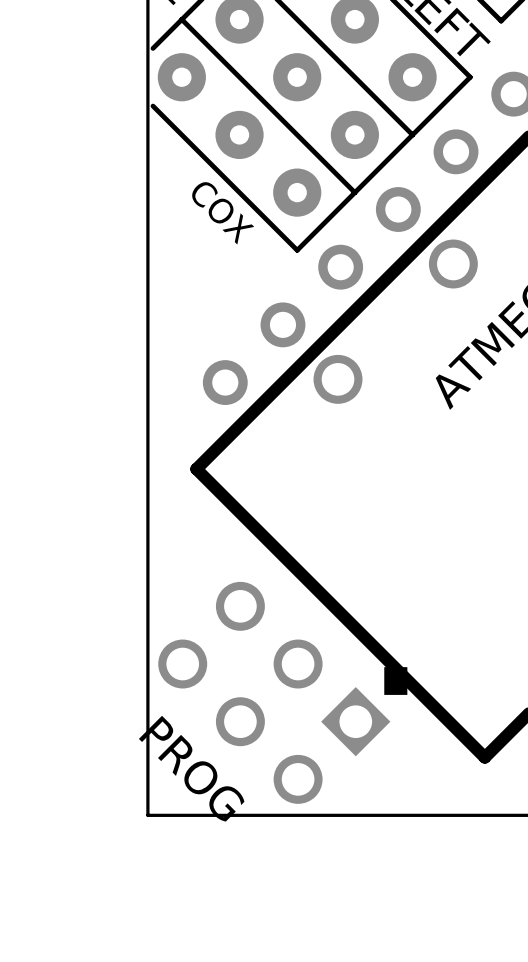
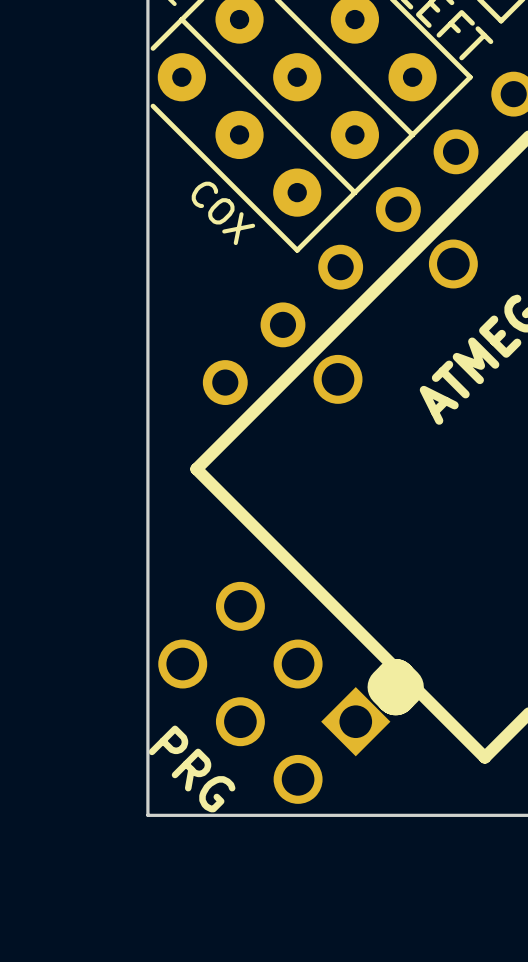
part value: PROG (191, 768) -> PRG (192, 768)

